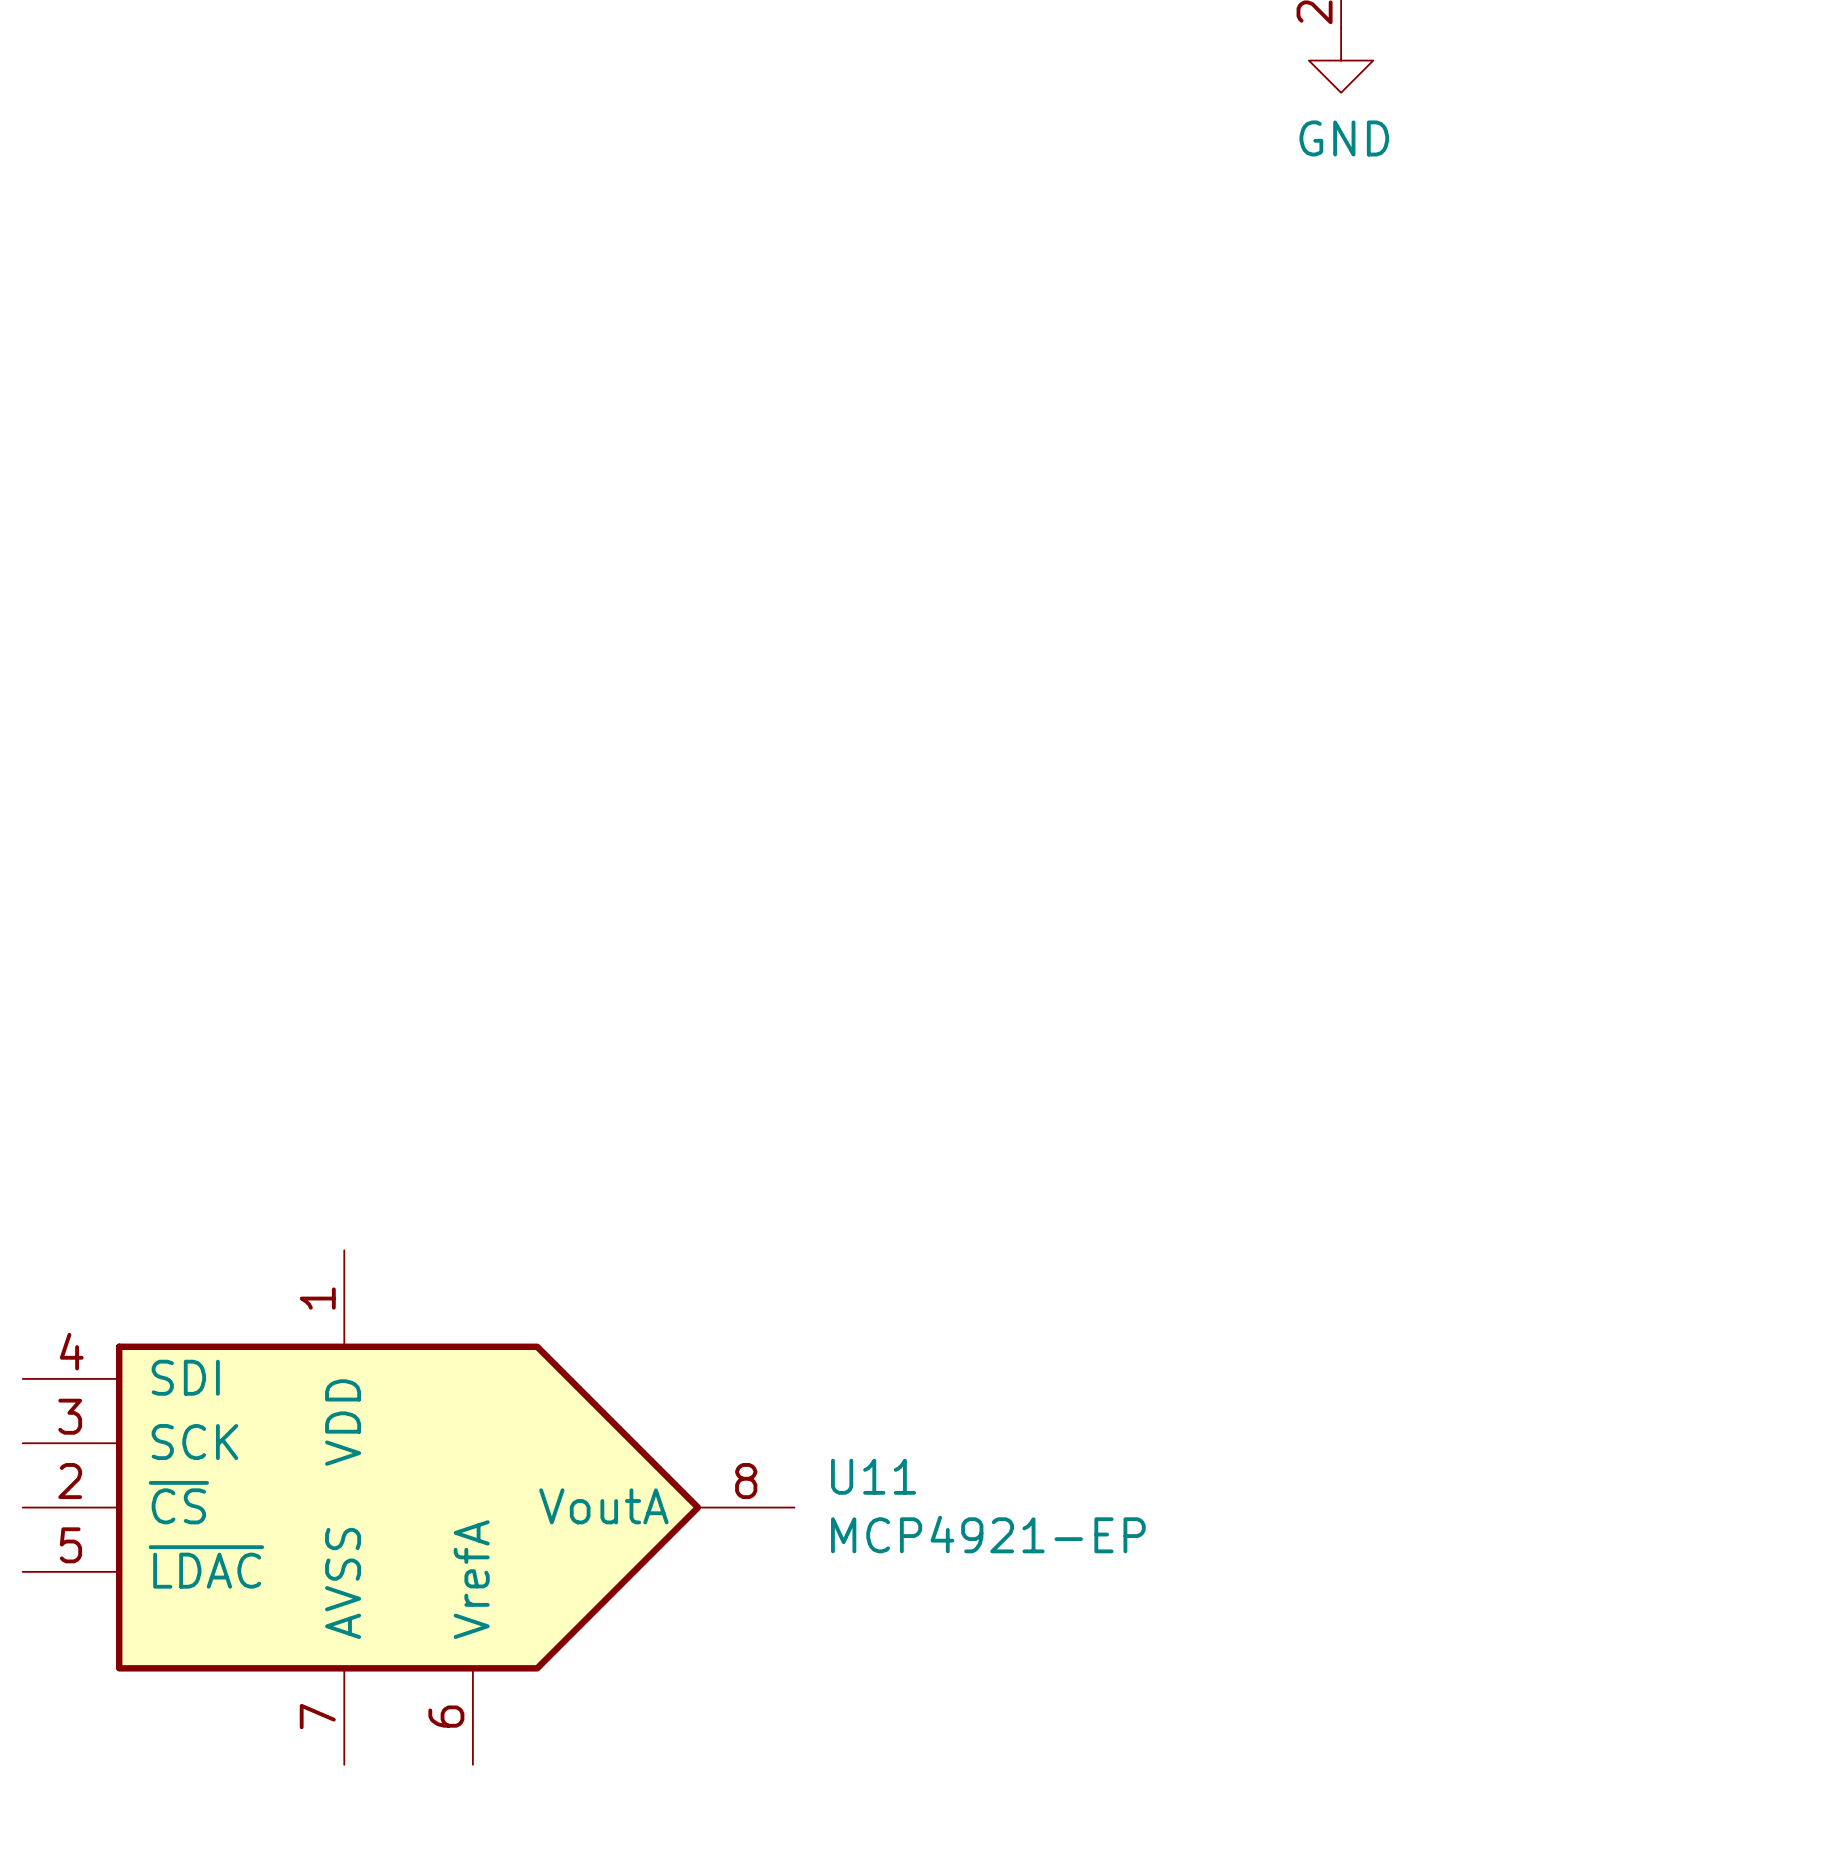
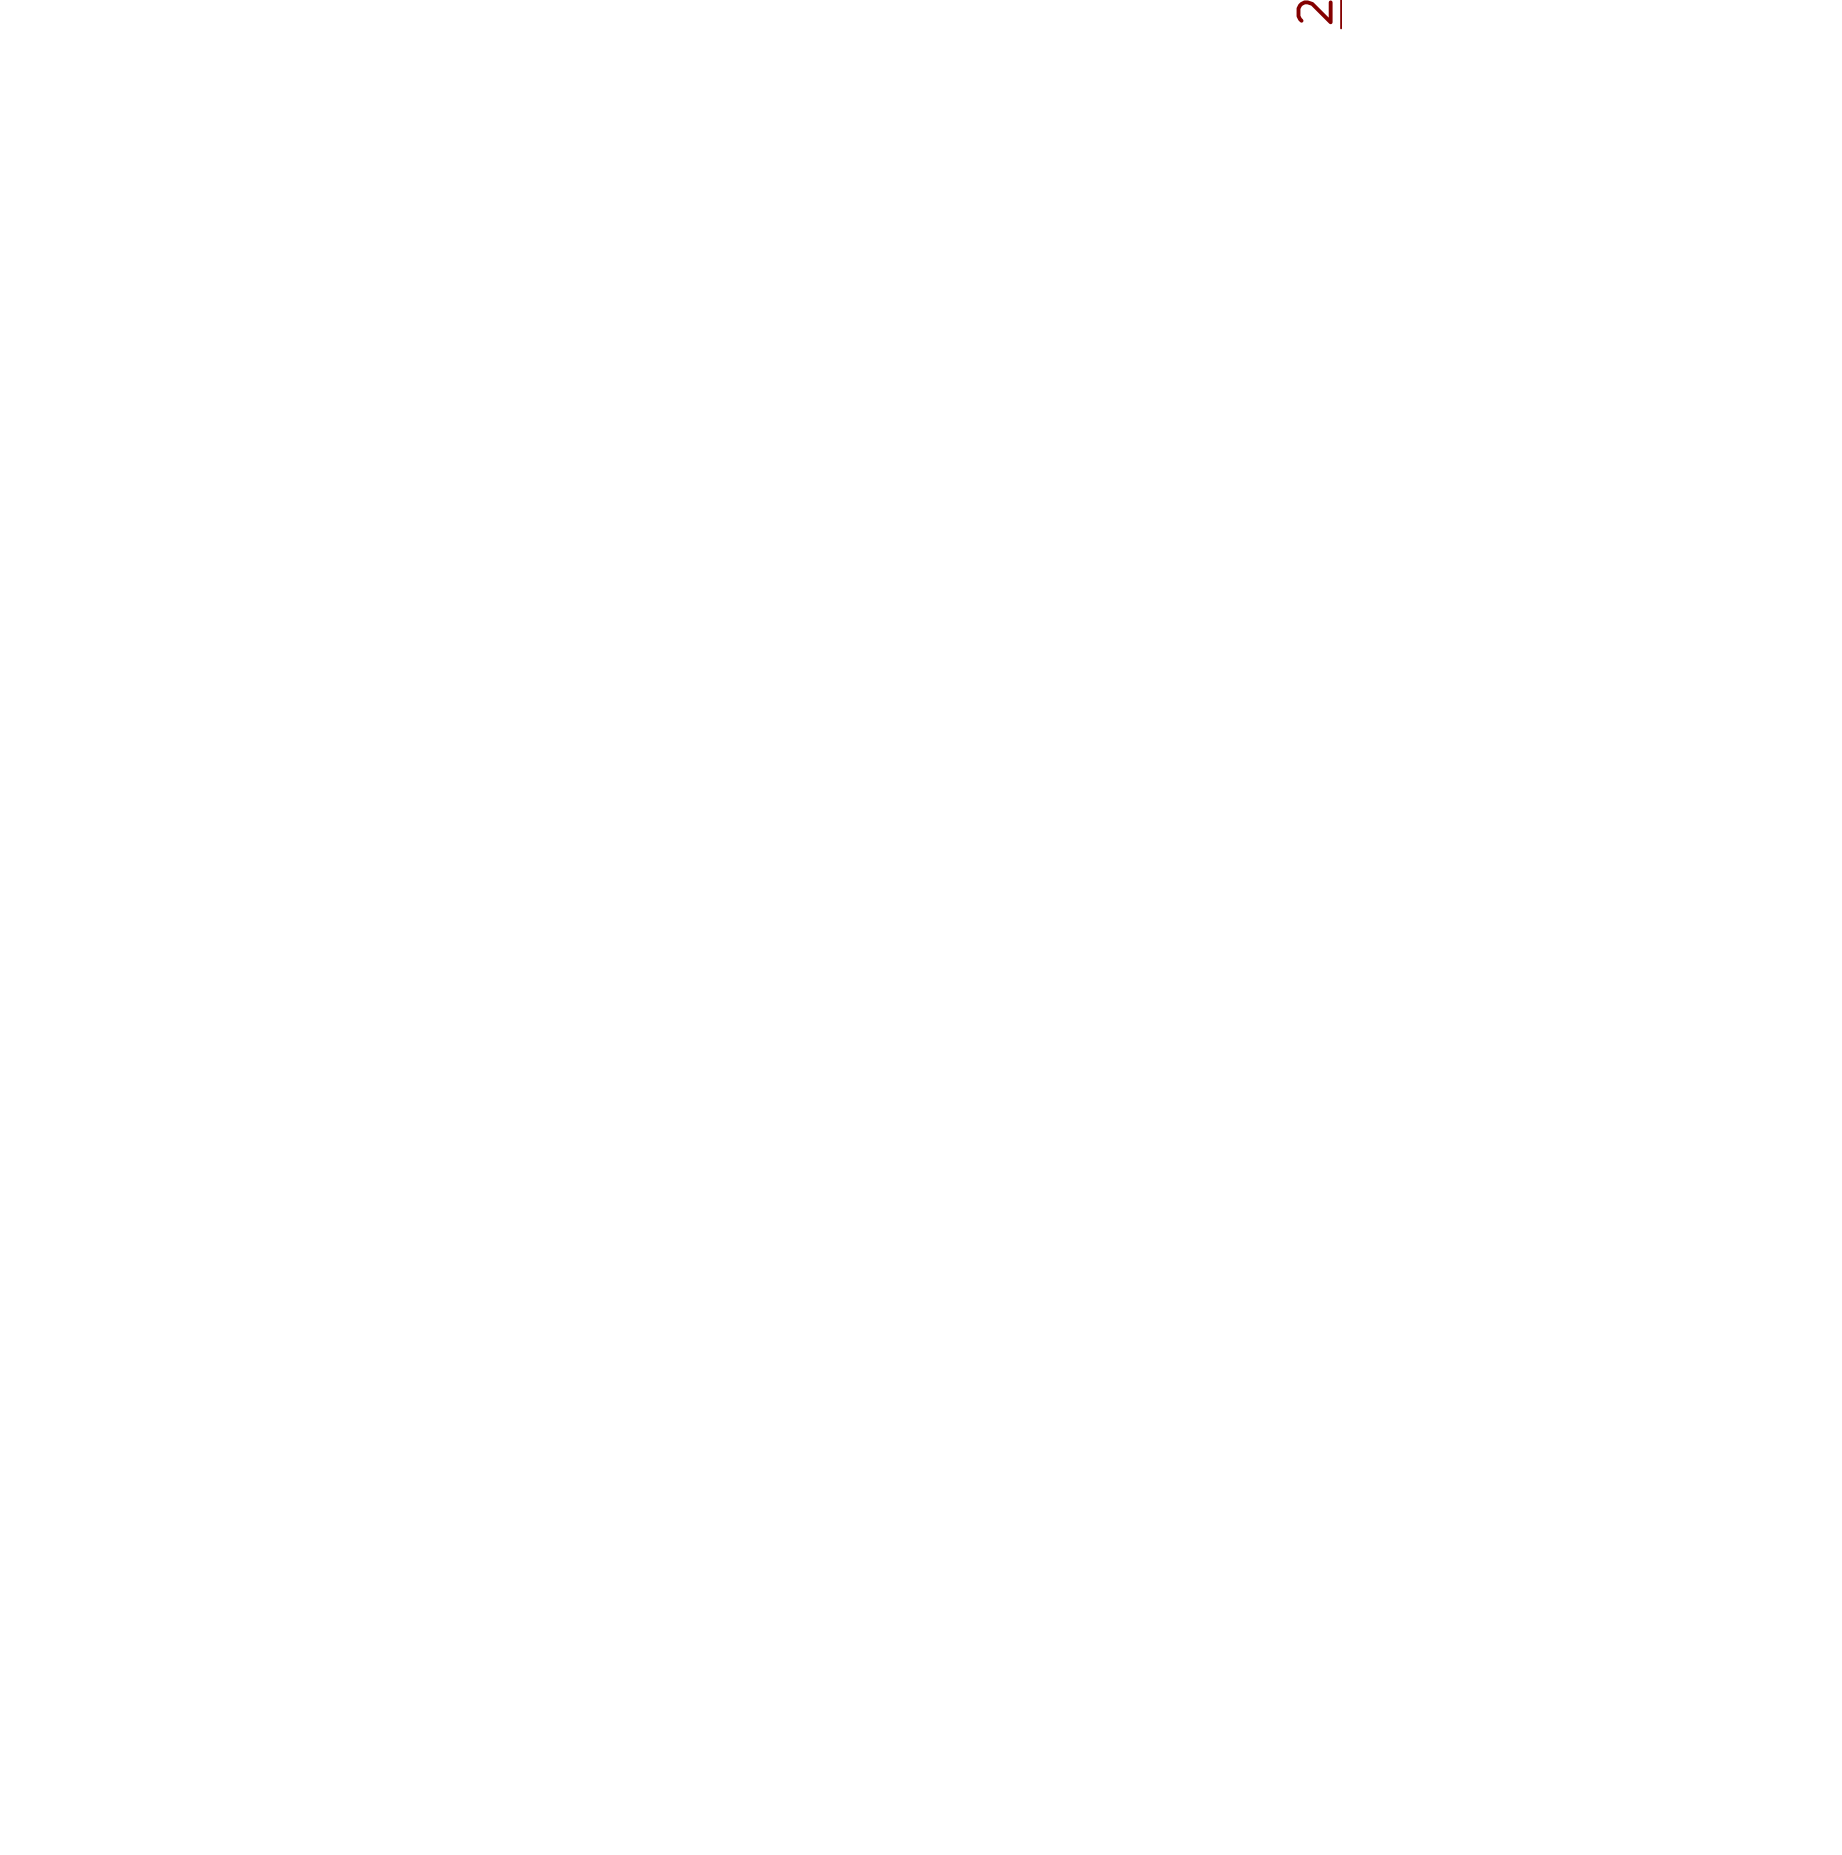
power symbol: GND (1341, 60) -> none
U11: MCP4921-EP (408, 1507) -> none

